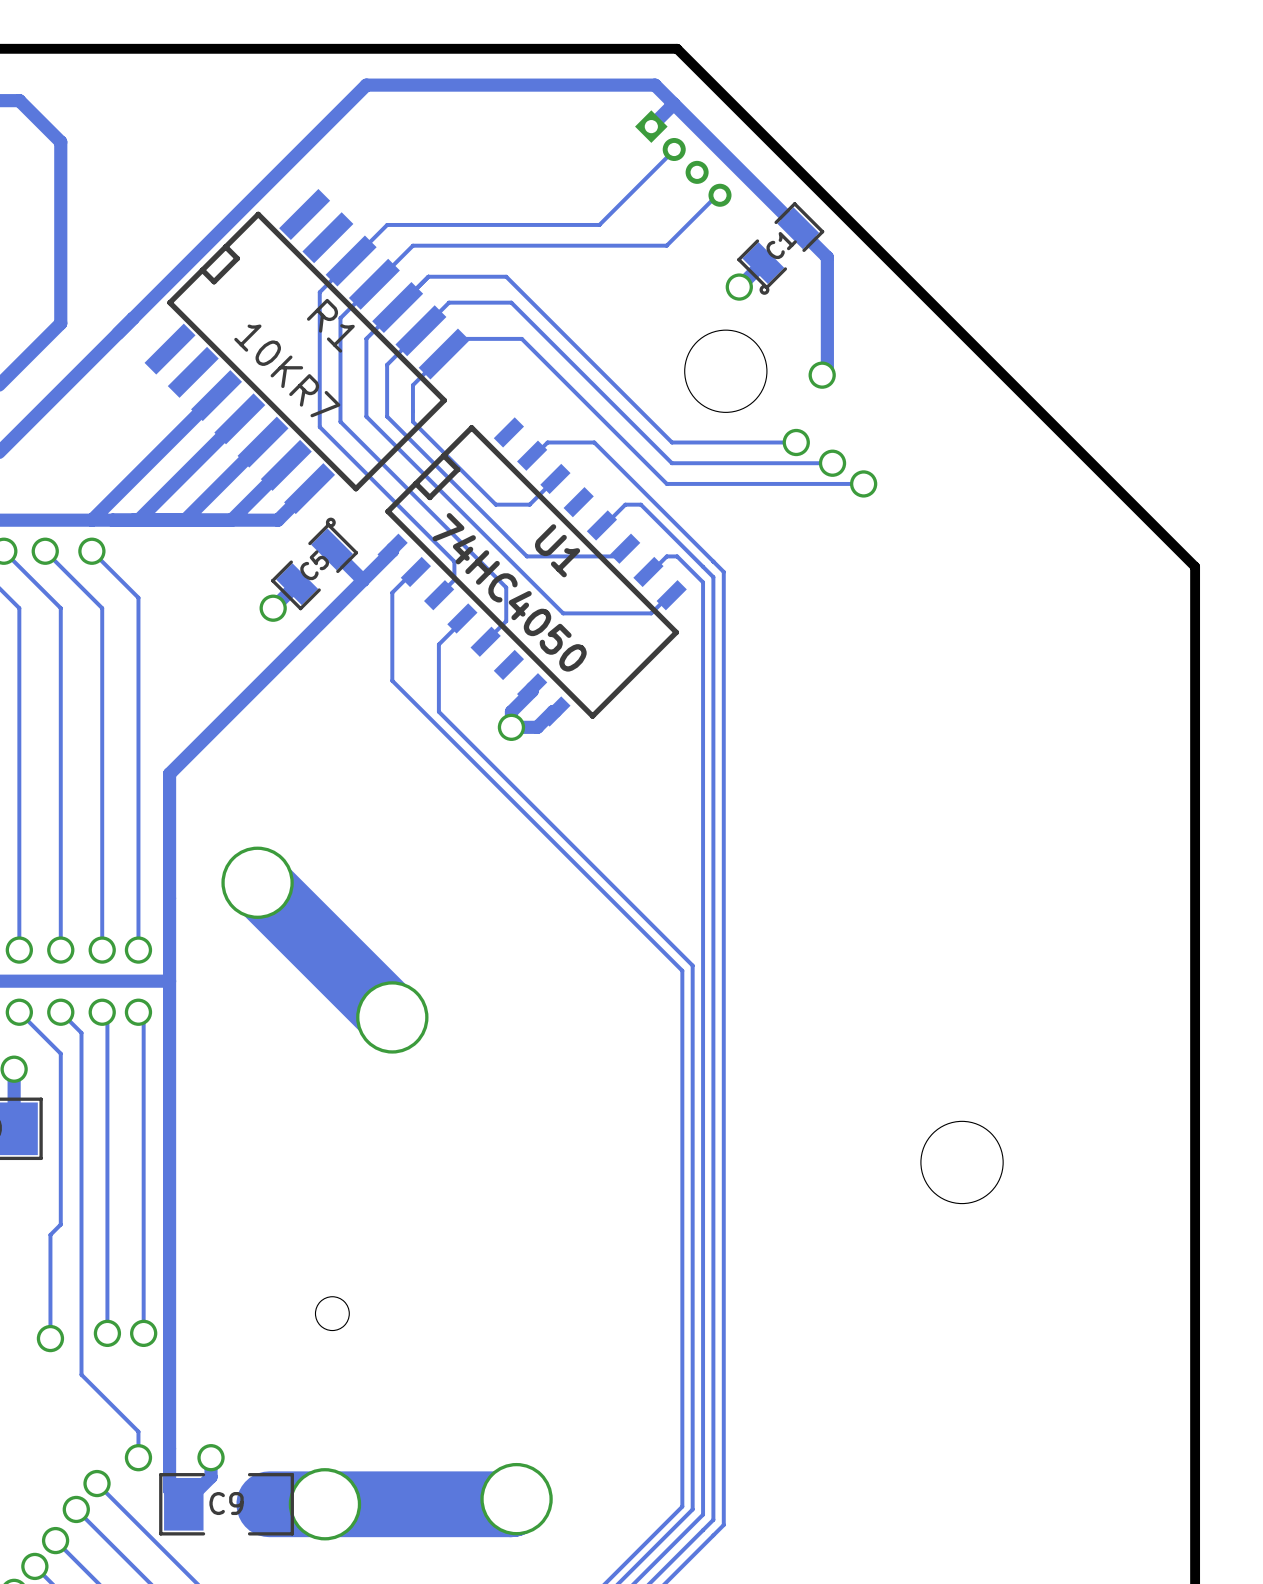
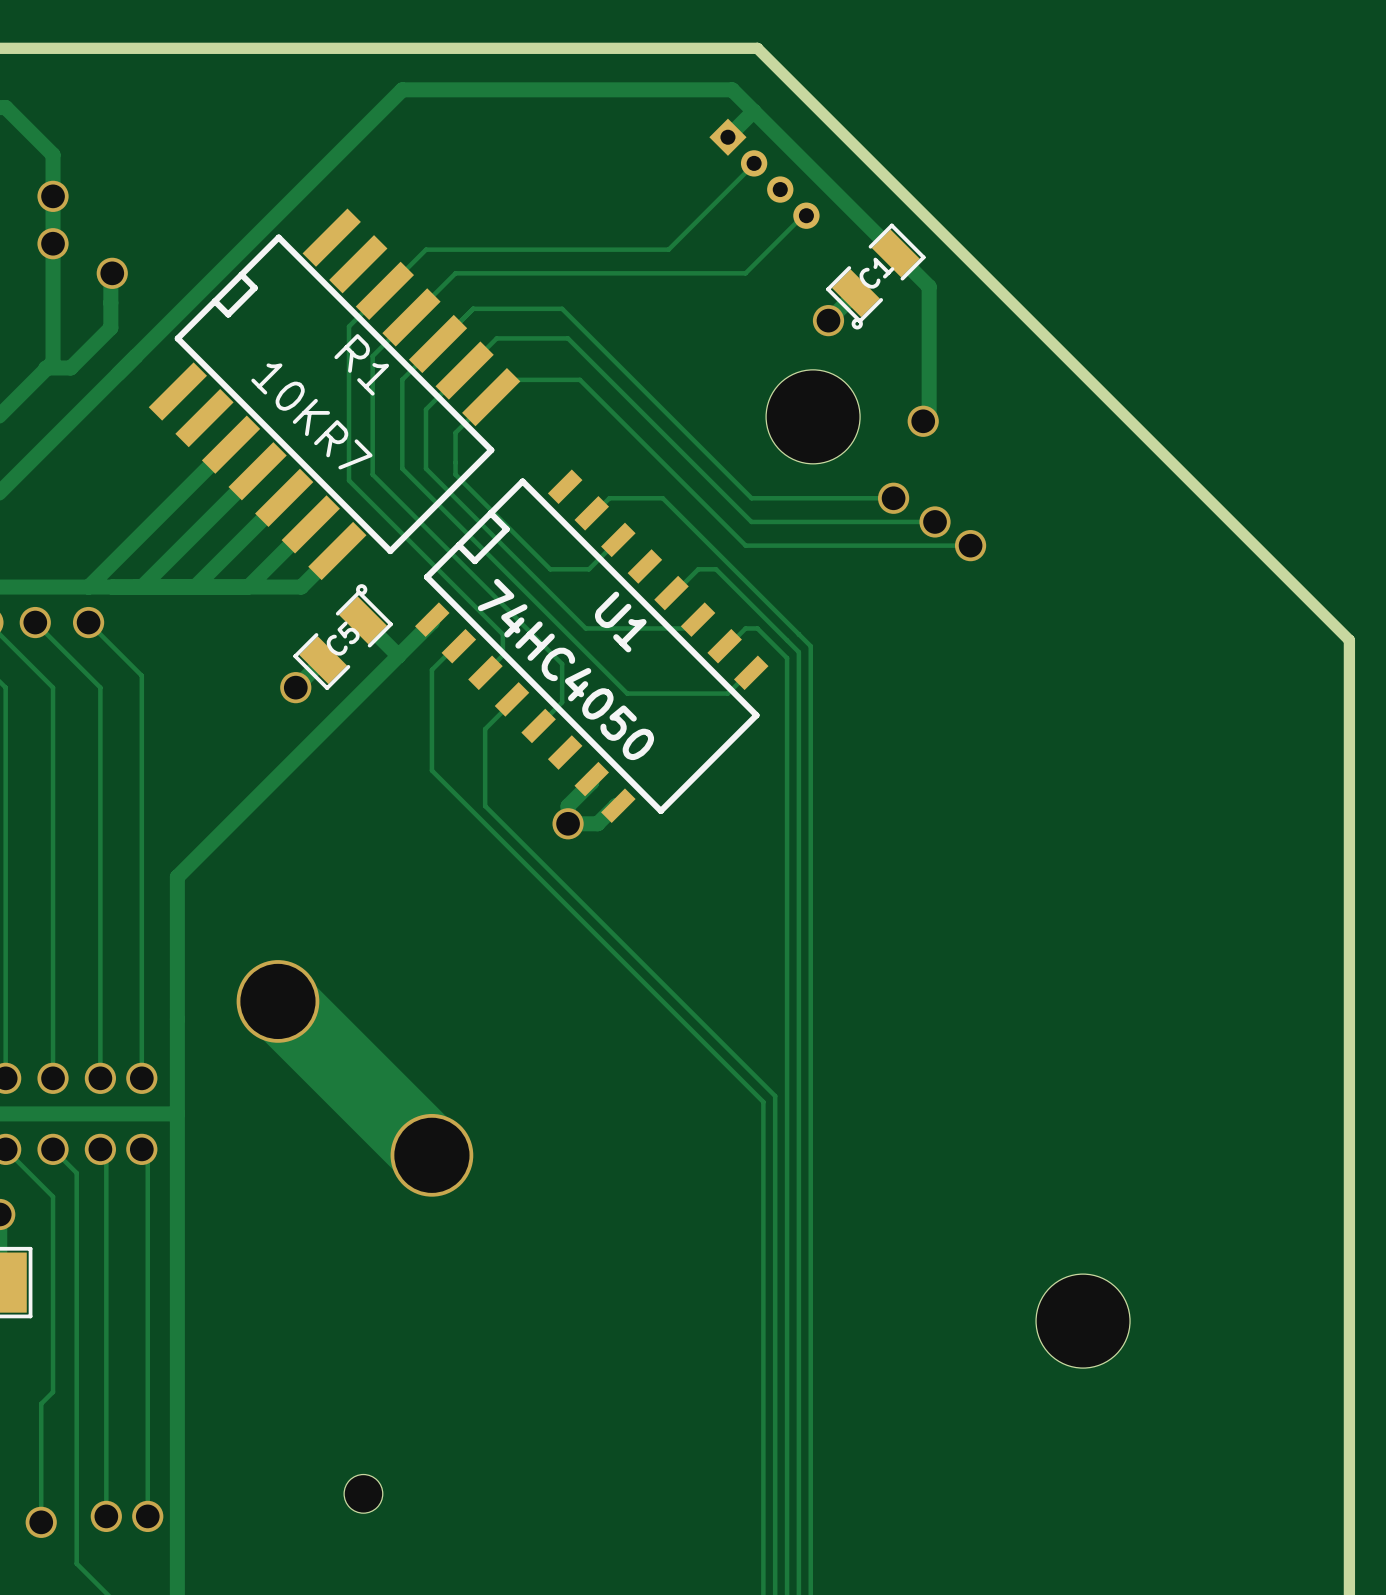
via: none -> (53, 196)
via: none -> (53, 243)
track: none -> (112, 273) (110, 327) (70, 367) (45, 367)
via: none -> (112, 273)

